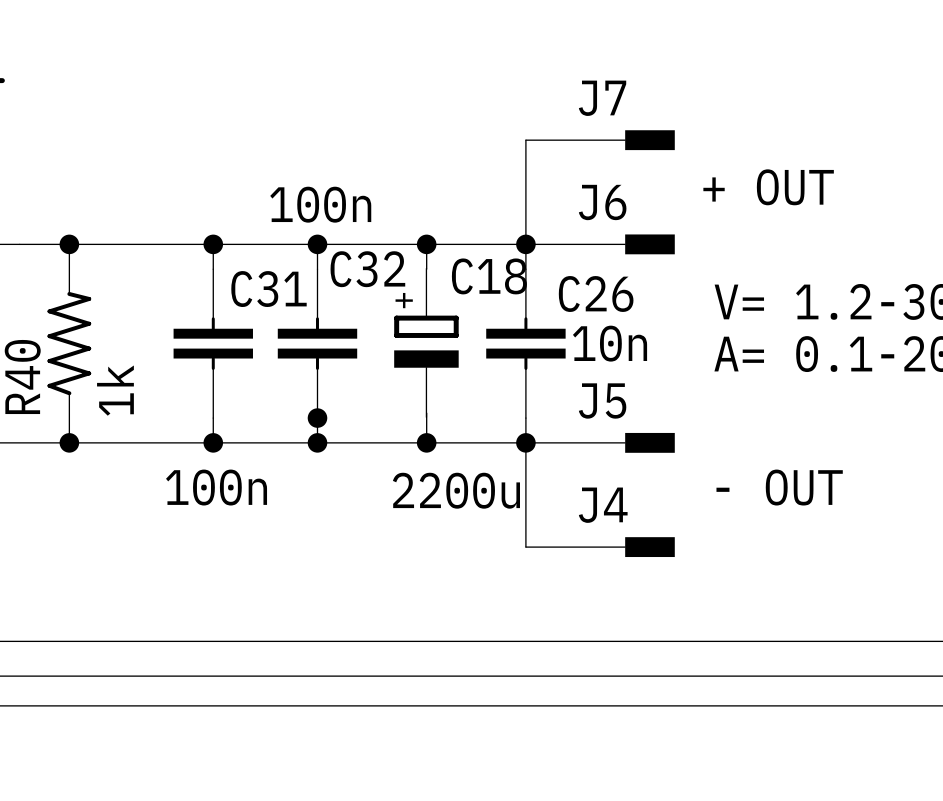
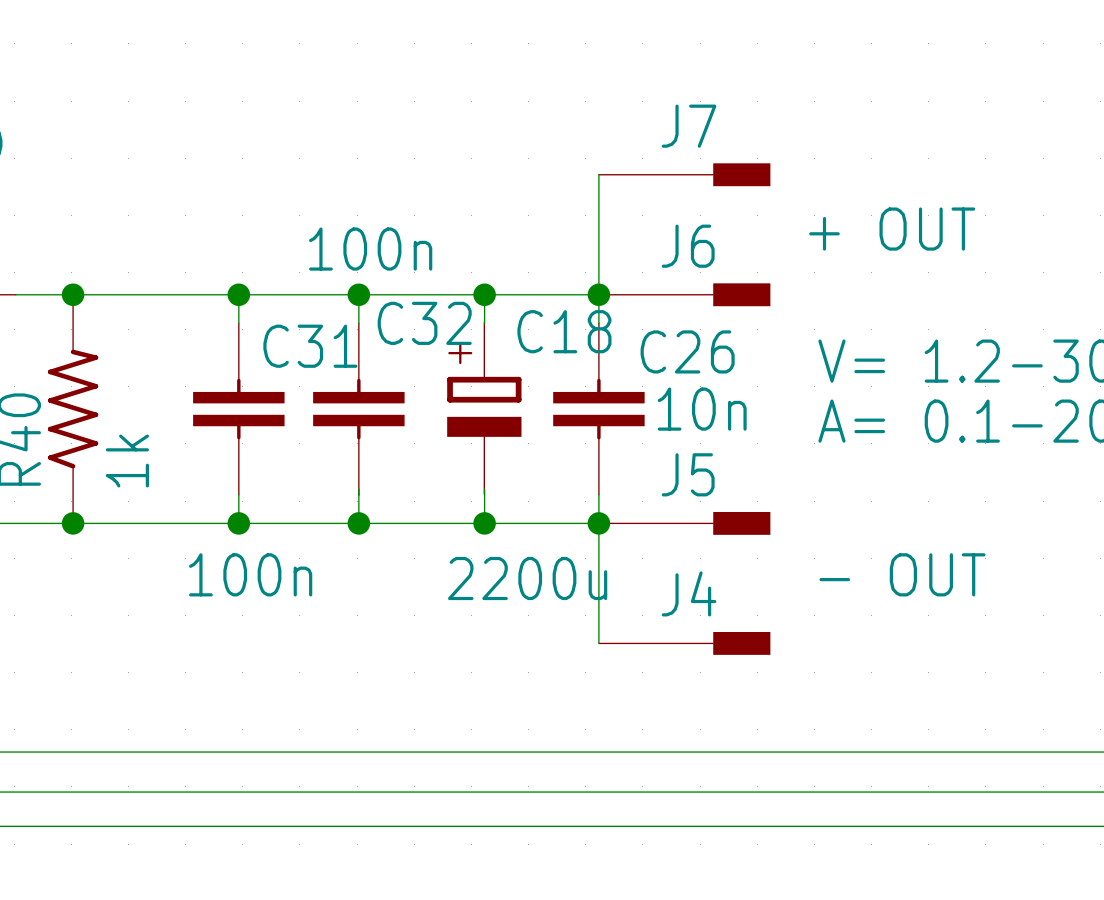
junction: (317, 418) -> none

